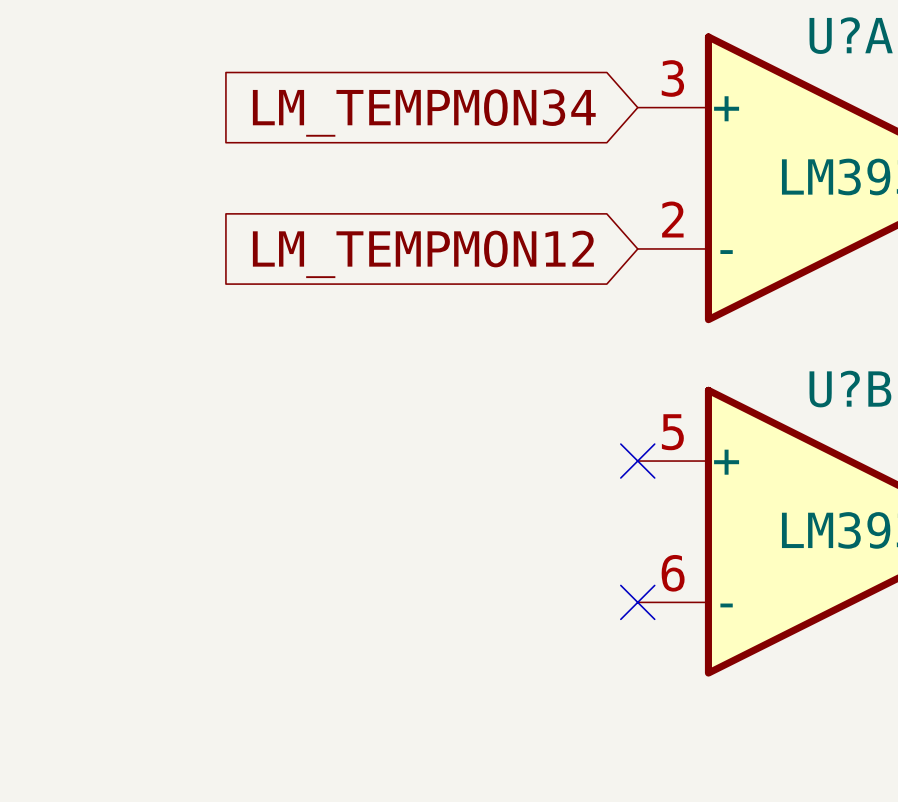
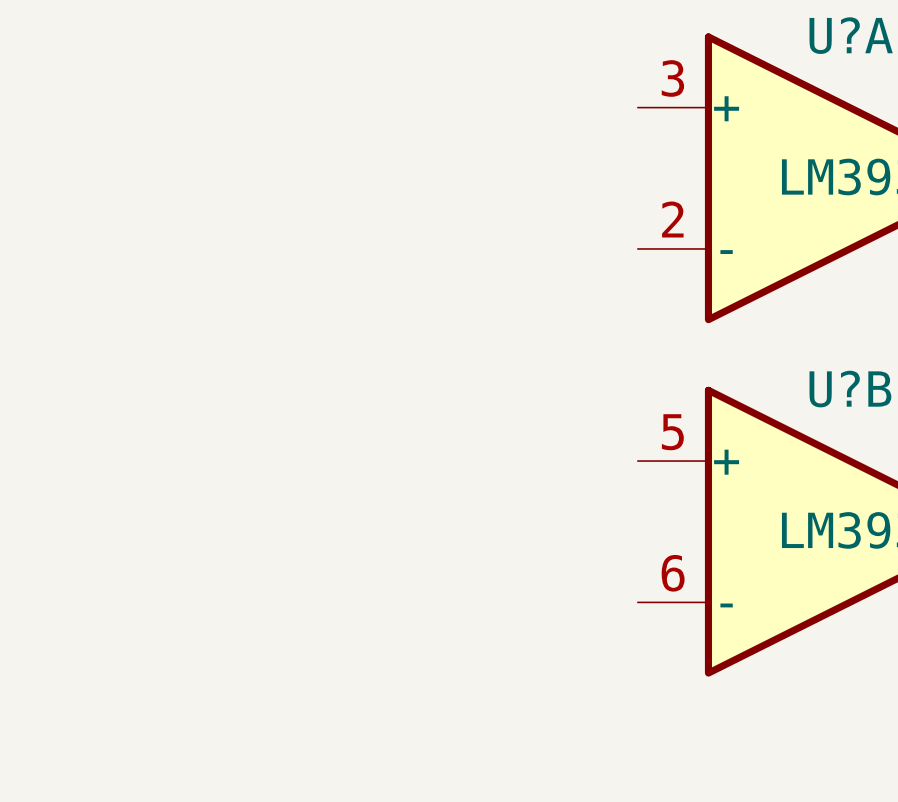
global label: LM_TEMPMON34 (424, 113) -> none
global label: LM_TEMPMON12 (423, 254) -> none
no-connect mark: (637, 461) -> none
no-connect mark: (637, 602) -> none

